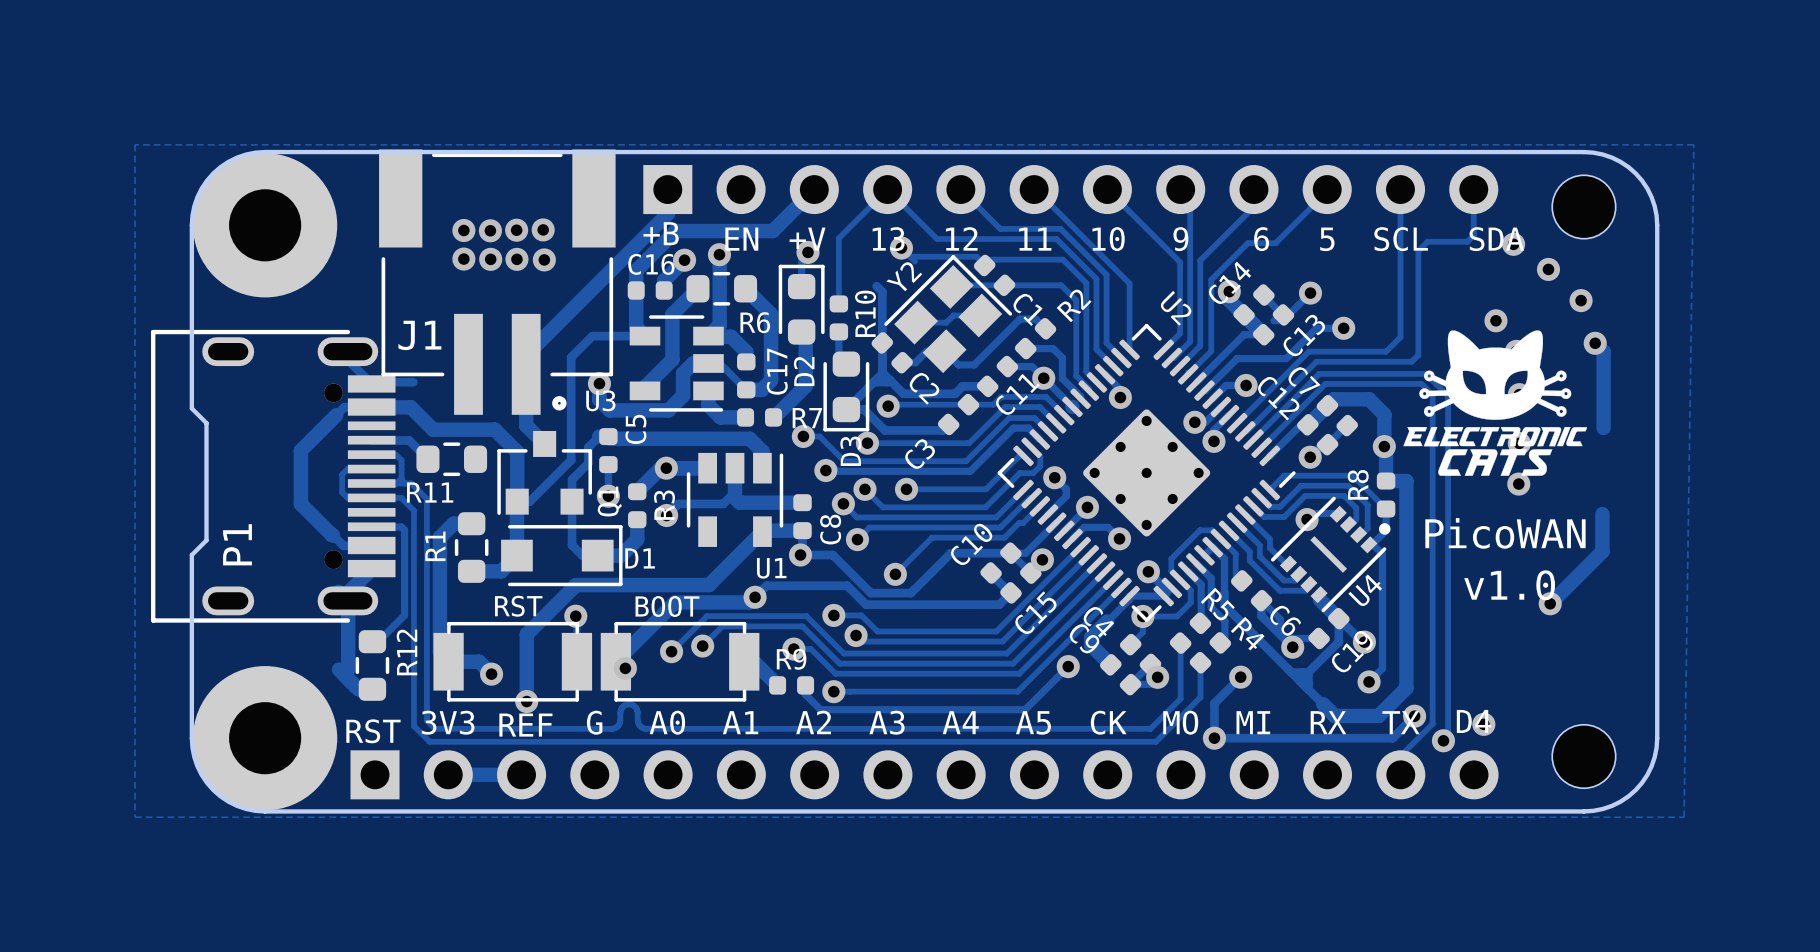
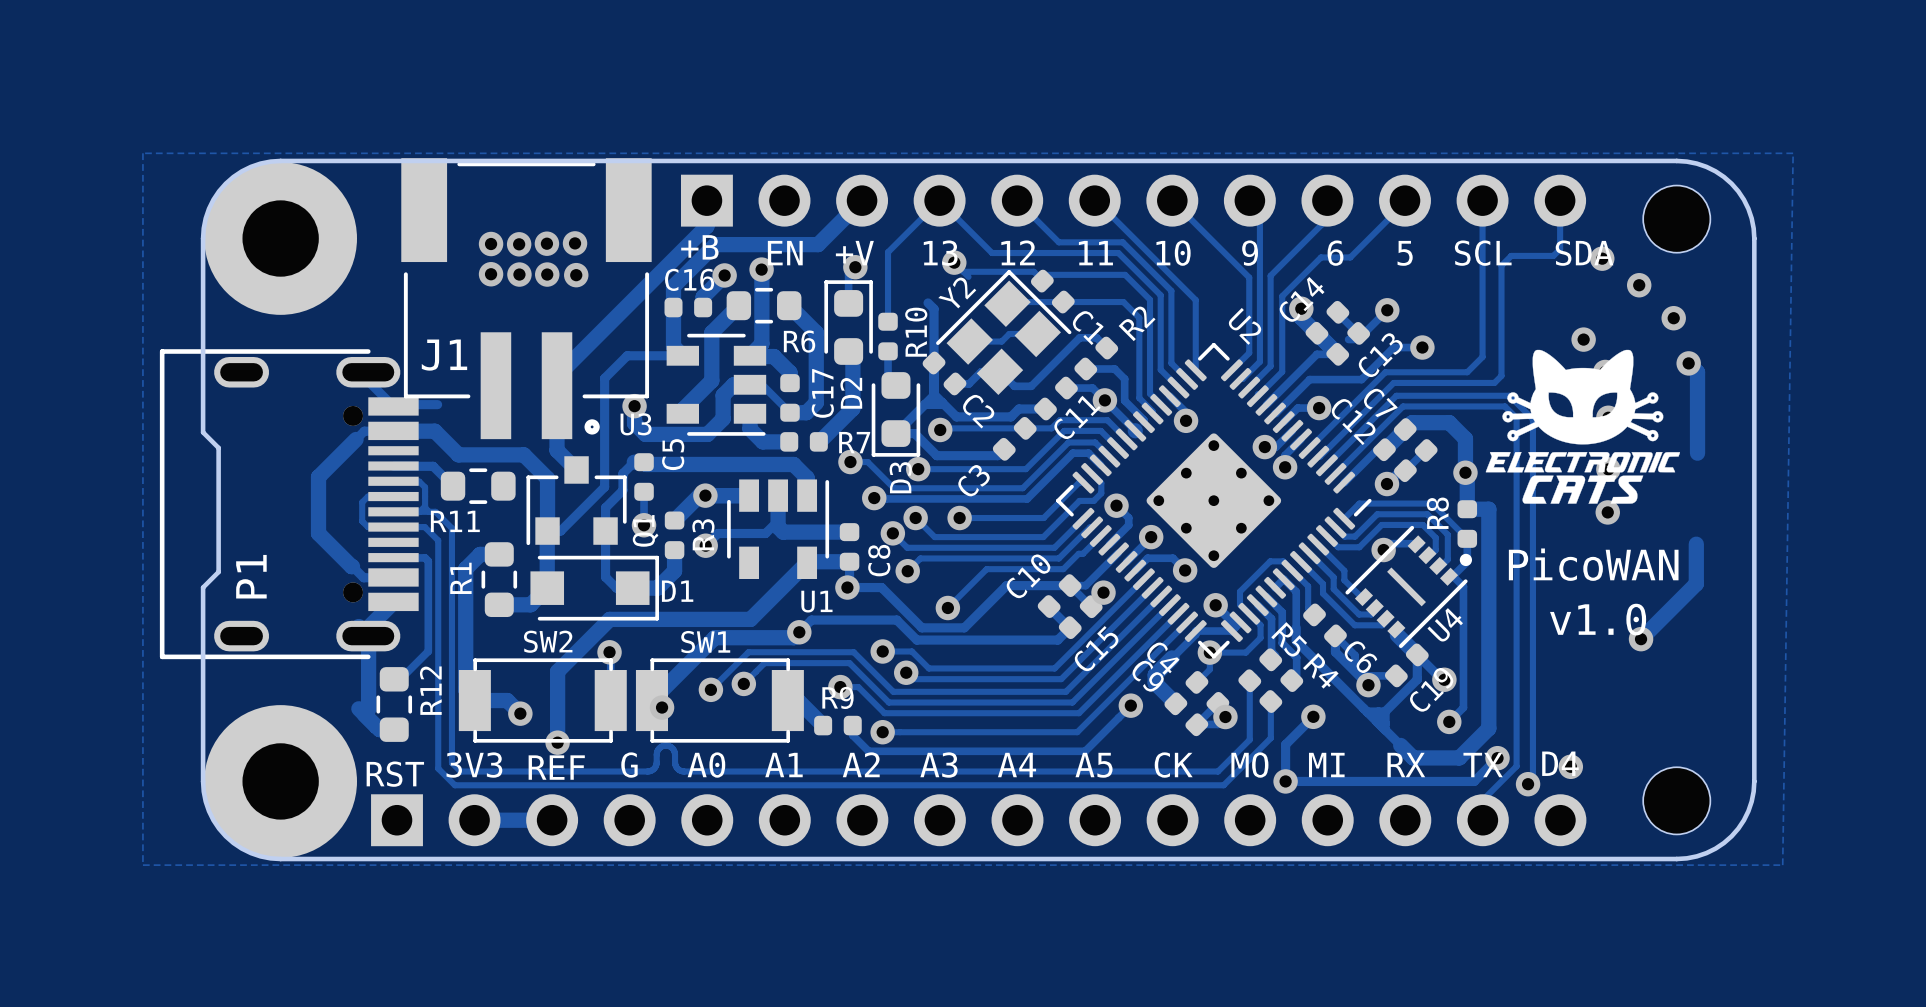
RST name: RST (518, 606) -> SW2 (548, 641)
BOOT name: BOOT (667, 606) -> SW1 (705, 642)

